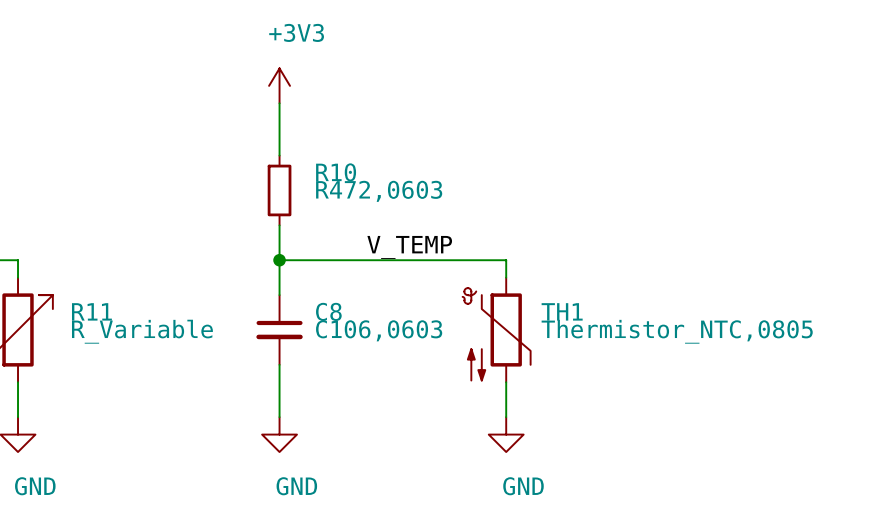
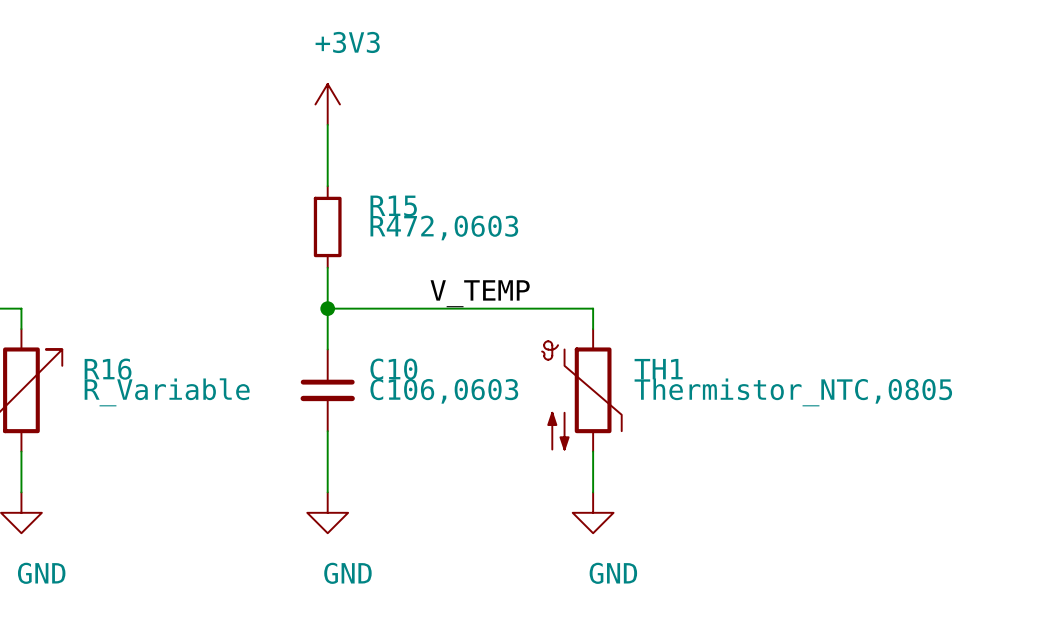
R10 name: R10 (336, 172) -> R15 (393, 205)
R11 name: R11 (91, 311) -> R16 (108, 369)
C8 name: C8 (328, 311) -> C10 (393, 369)

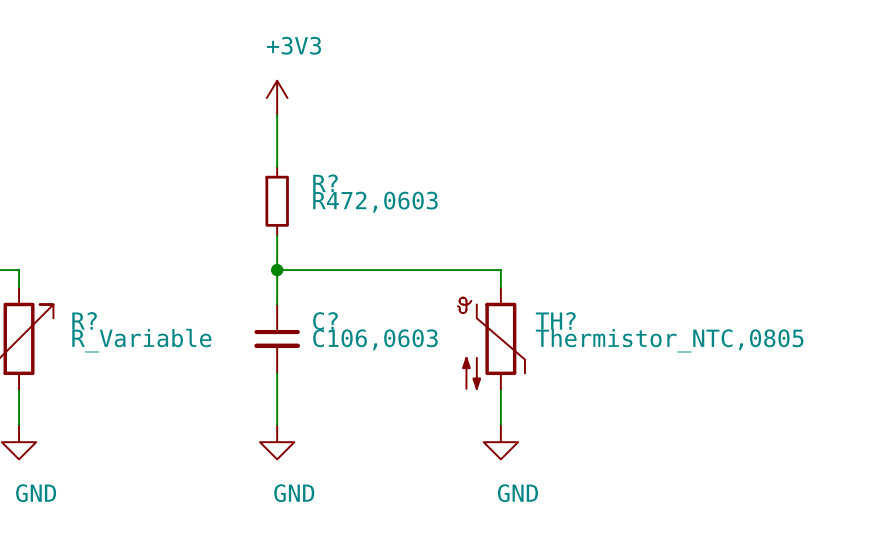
R15 name: R15 (393, 205) -> R? (325, 183)
label: V_TEMP (480, 293) -> none
R16 name: R16 (108, 369) -> R? (84, 320)
C10 name: C10 (393, 369) -> C? (325, 321)
TH1 name: TH1 (658, 369) -> TH? (555, 320)

